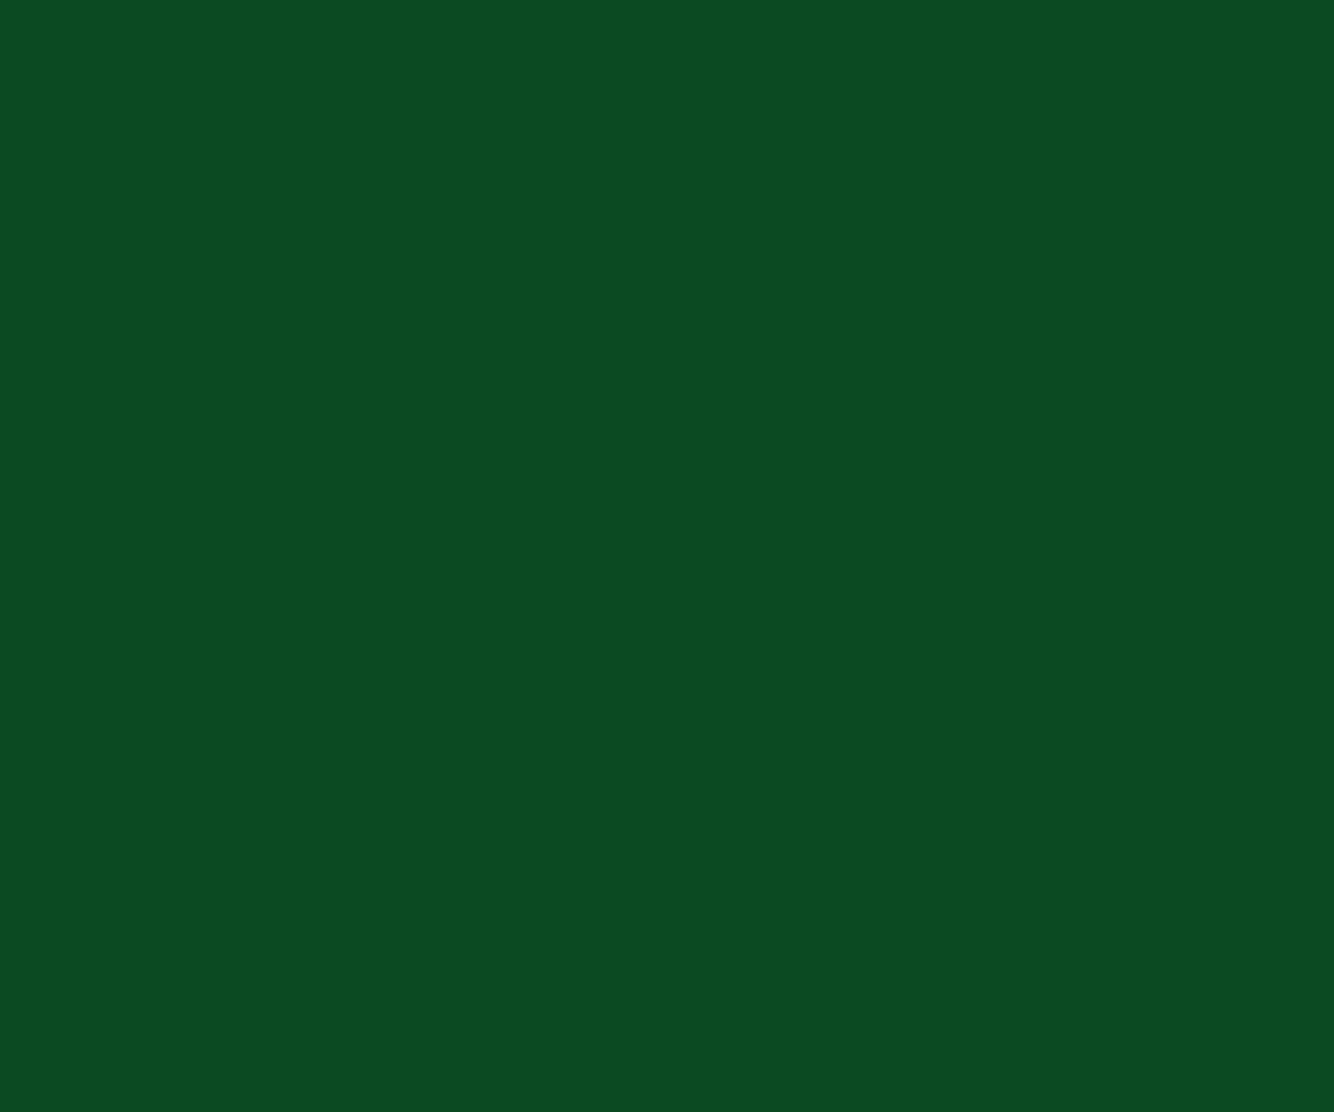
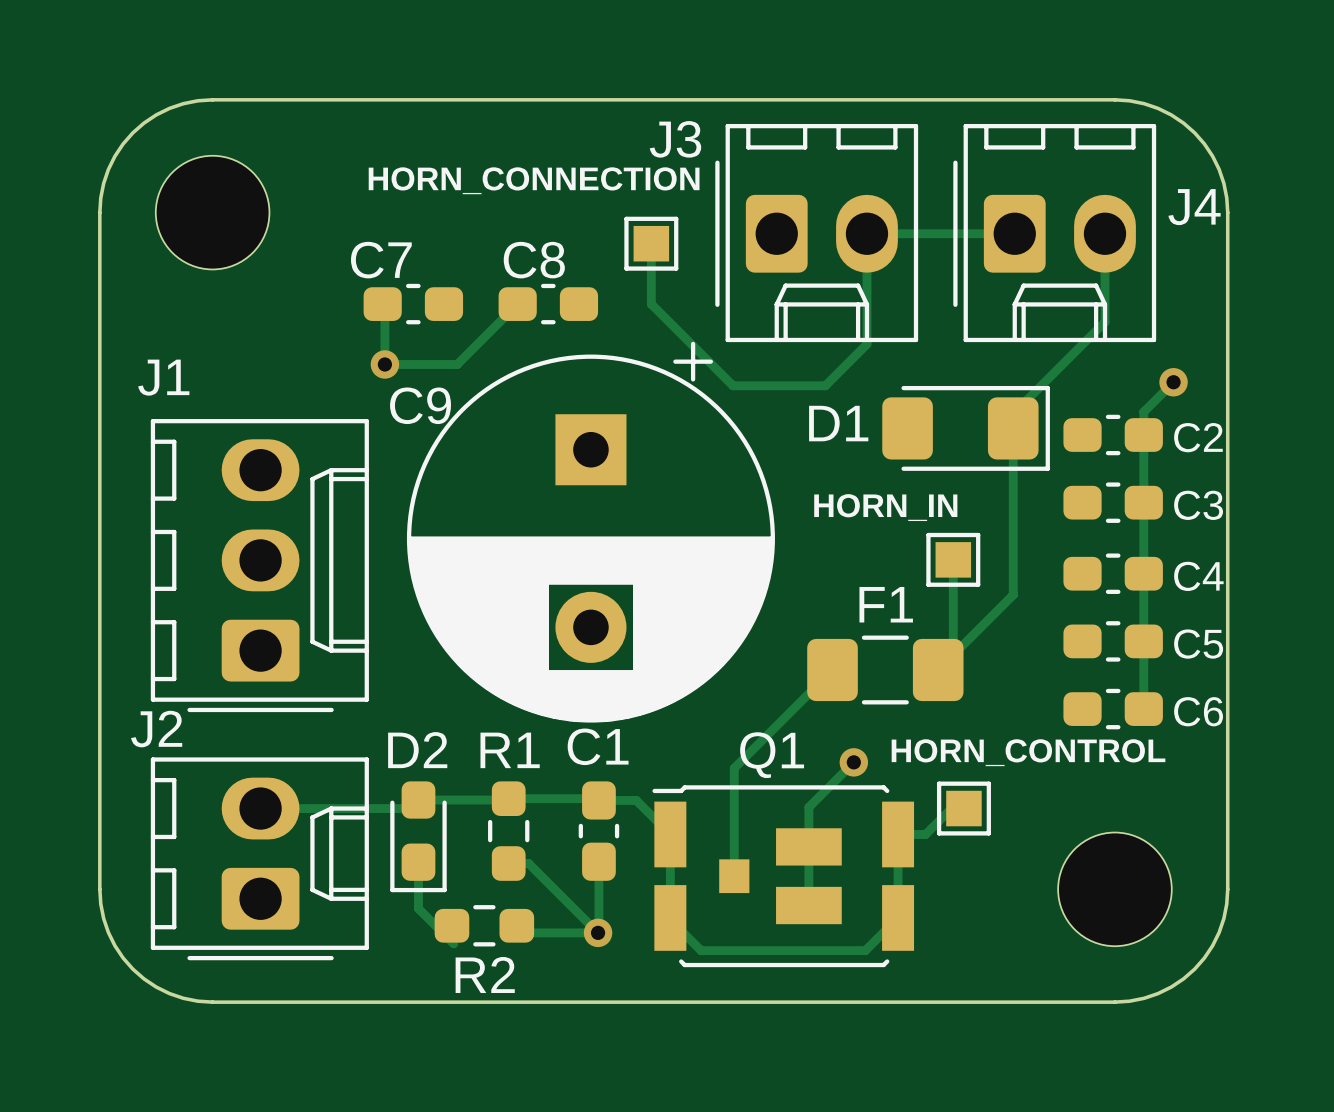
board edge: none -> (212, 99) (1114, 99) (1144, 103) (1158, 108) (1183, 123) (1194, 132) (1212, 156) (1223, 183) (1227, 212) (1227, 889) (1223, 918) (1219, 932) (1204, 958) (1183, 978) (1158, 993) (1129, 1001) (1114, 1002) (212, 1002) (183, 998) (169, 993) (143, 978) (123, 958) (108, 932) (100, 904) (99, 889) (100, 197) (108, 169) (123, 143) (132, 132) (143, 123) (169, 108) (197, 100) (212, 99)
part: none -> (212, 212)
J3: none -> (816, 233)
track: none -> (1014, 233) (866, 233) (866, 344) (825, 385) (733, 385) (651, 304) (651, 257)
J4: none -> (1054, 233)
track: none -> (1104, 233) (1104, 322) (1013, 413) (1013, 594)
HORN_CONNECTION: none -> (651, 243)
track: none -> (382, 304) (384, 306) (384, 364) (457, 364) (517, 304)
C7: none -> (413, 304)
C8: none -> (548, 304)
via: none -> (384, 364)
track: none -> (1173, 382) (1143, 412) (1143, 709)
via: none -> (1173, 382)
D1: none -> (966, 428)
C2: none -> (1113, 435)
C3: none -> (1113, 502)
C9: none -> (590, 532)
track: none -> (953, 559) (953, 654)
HORN_IN: none -> (953, 559)
J1: none -> (259, 565)
C4: none -> (1113, 573)
track: none -> (1013, 594) (938, 670)
C5: none -> (1113, 641)
track: none -> (832, 670) (734, 768) (734, 876)
F1: none -> (885, 670)
C6: none -> (1113, 709)
track: none -> (853, 762) (808, 807) (808, 905)
via: none -> (853, 762)
track: none -> (963, 796) (925, 834) (898, 834) (898, 917) (865, 950) (701, 950) (670, 919) (670, 834) (636, 800) (598, 800) (597, 798) (418, 800) (409, 808) (260, 808)
HORN_CONTROL: none -> (963, 808)
R1: none -> (508, 831)
C1: none -> (598, 831)
D2: none -> (418, 836)
J2: none -> (259, 858)
track: none -> (598, 861) (598, 932)
track: none -> (418, 862) (418, 908) (453, 943)
track: none -> (508, 863) (528, 863) (598, 932)
Q1: none -> (783, 876)
part: none -> (1114, 889)
R2: none -> (484, 925)
track: none -> (516, 925) (523, 932) (598, 932)
via: none -> (598, 932)

